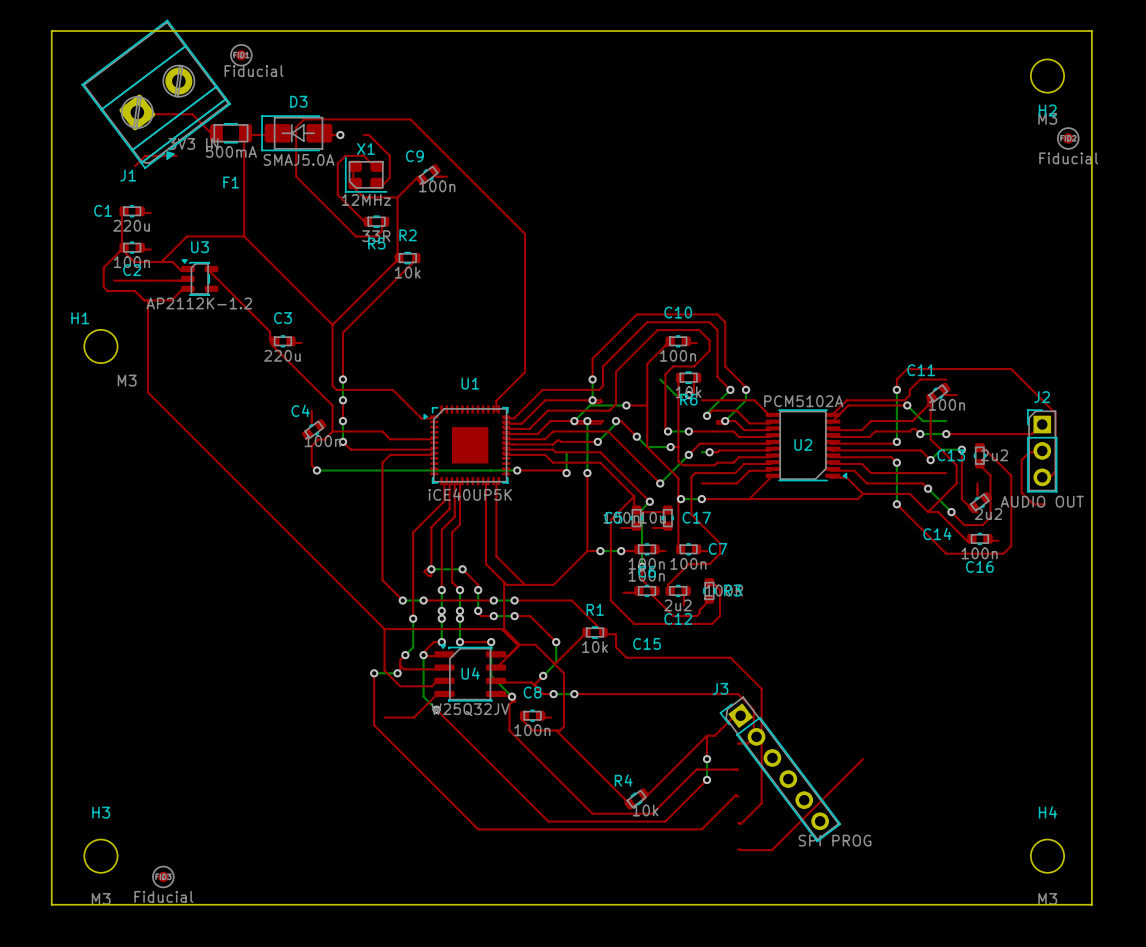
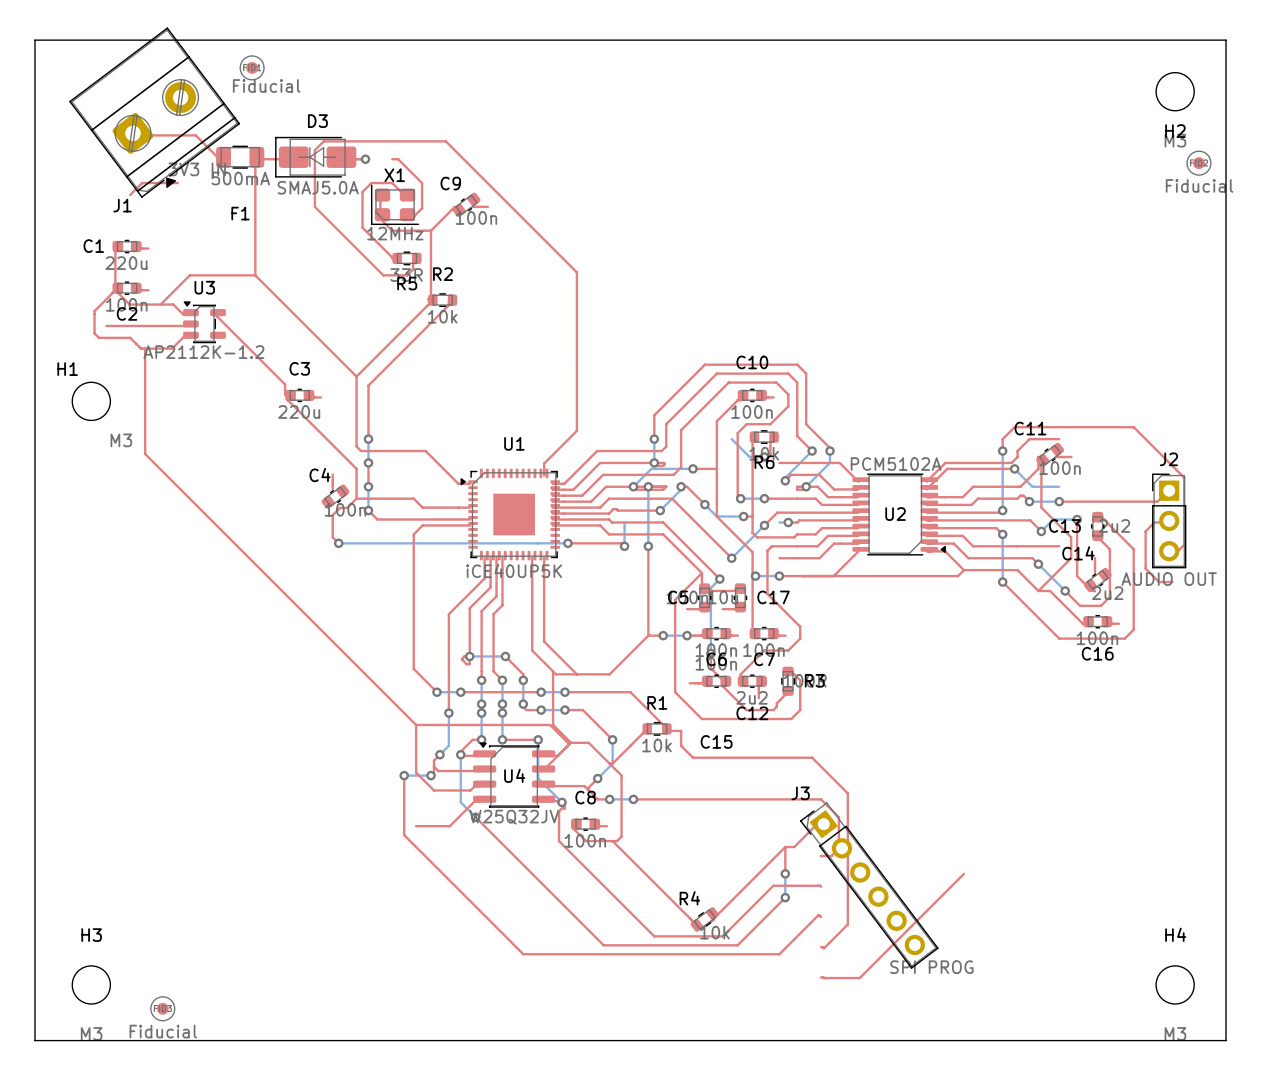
C14 name position: C14 (937, 534) -> C14 (1078, 553)
C7 name position: C7 (717, 548) -> C7 (764, 659)

